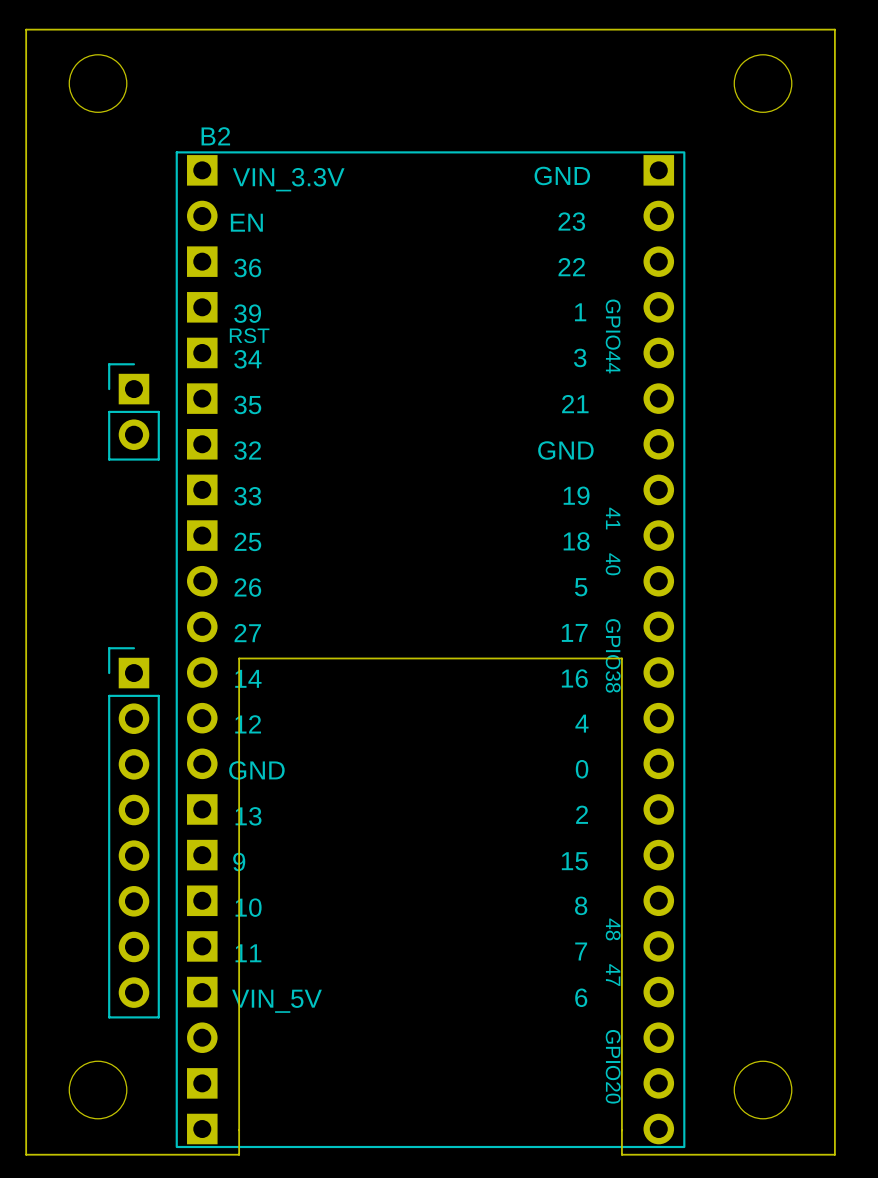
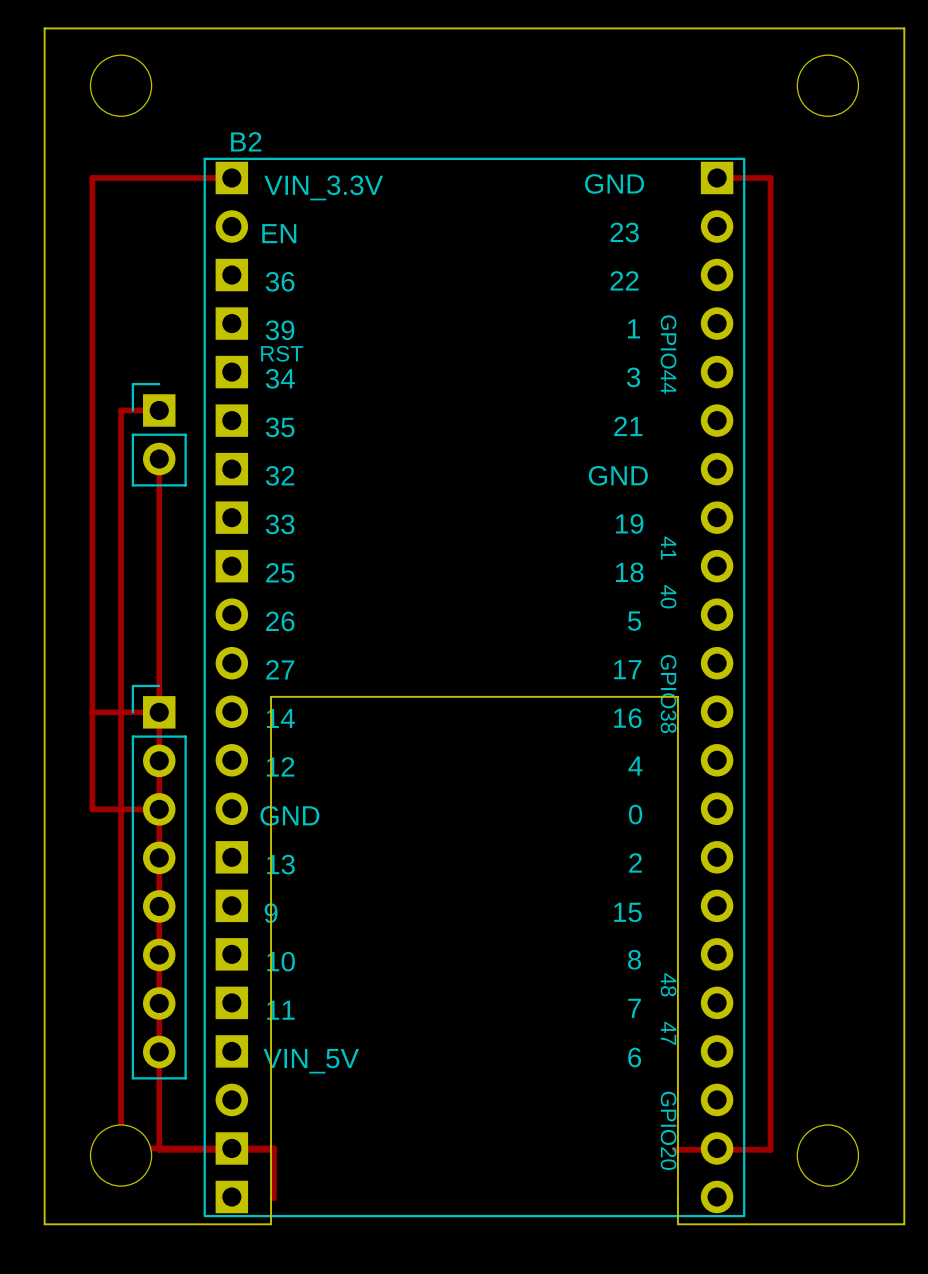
track: none -> (231, 177) (92, 177) (92, 809) (159, 809)
track: none -> (717, 177) (770, 177) (770, 1149) (675, 1149)
track: none -> (159, 410) (121, 410) (121, 1148) (273, 1148) (273, 1198)
track: none -> (159, 459) (159, 1149) (273, 1149)
track: none -> (92, 712) (159, 712)

